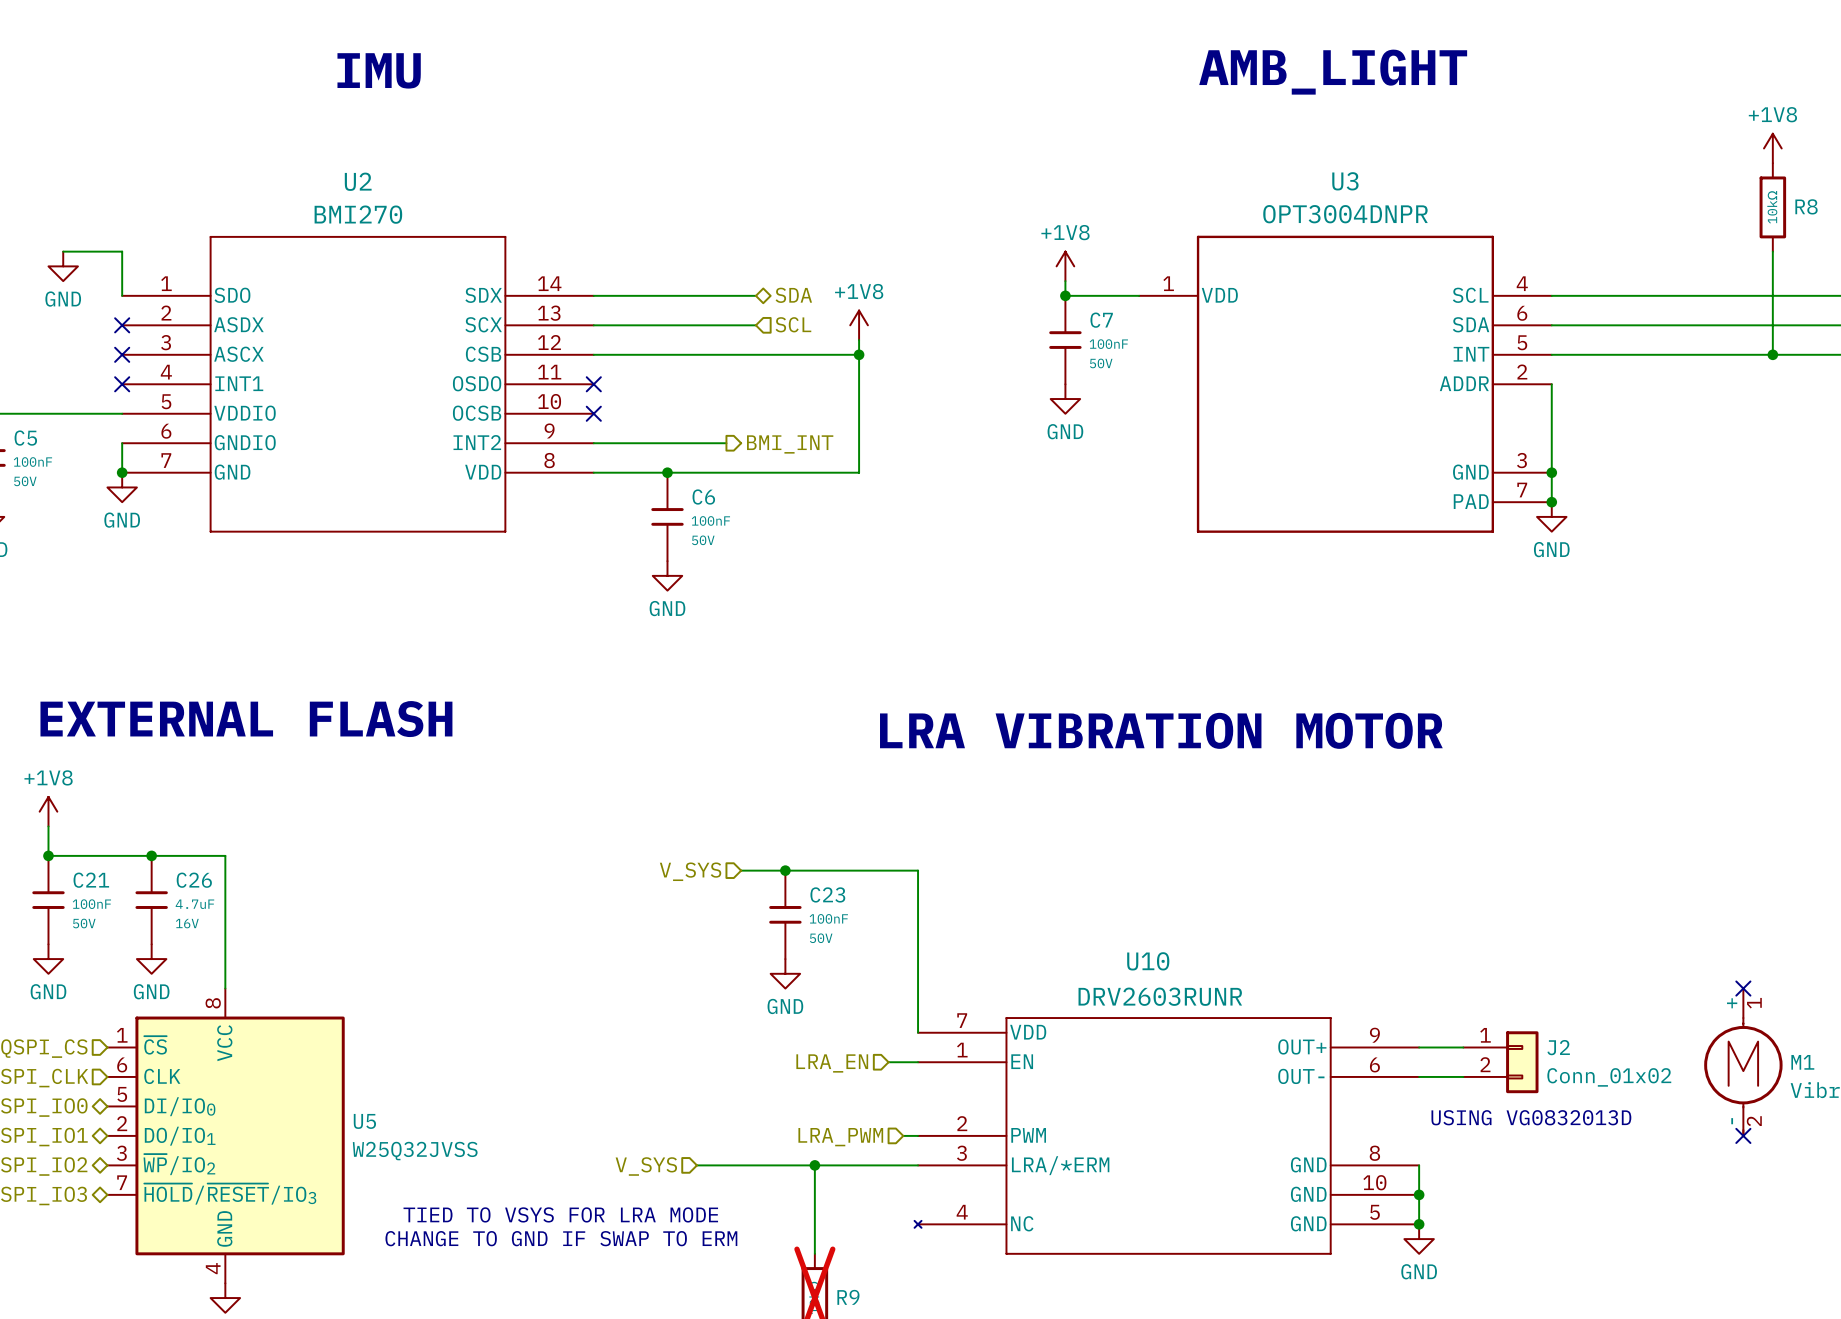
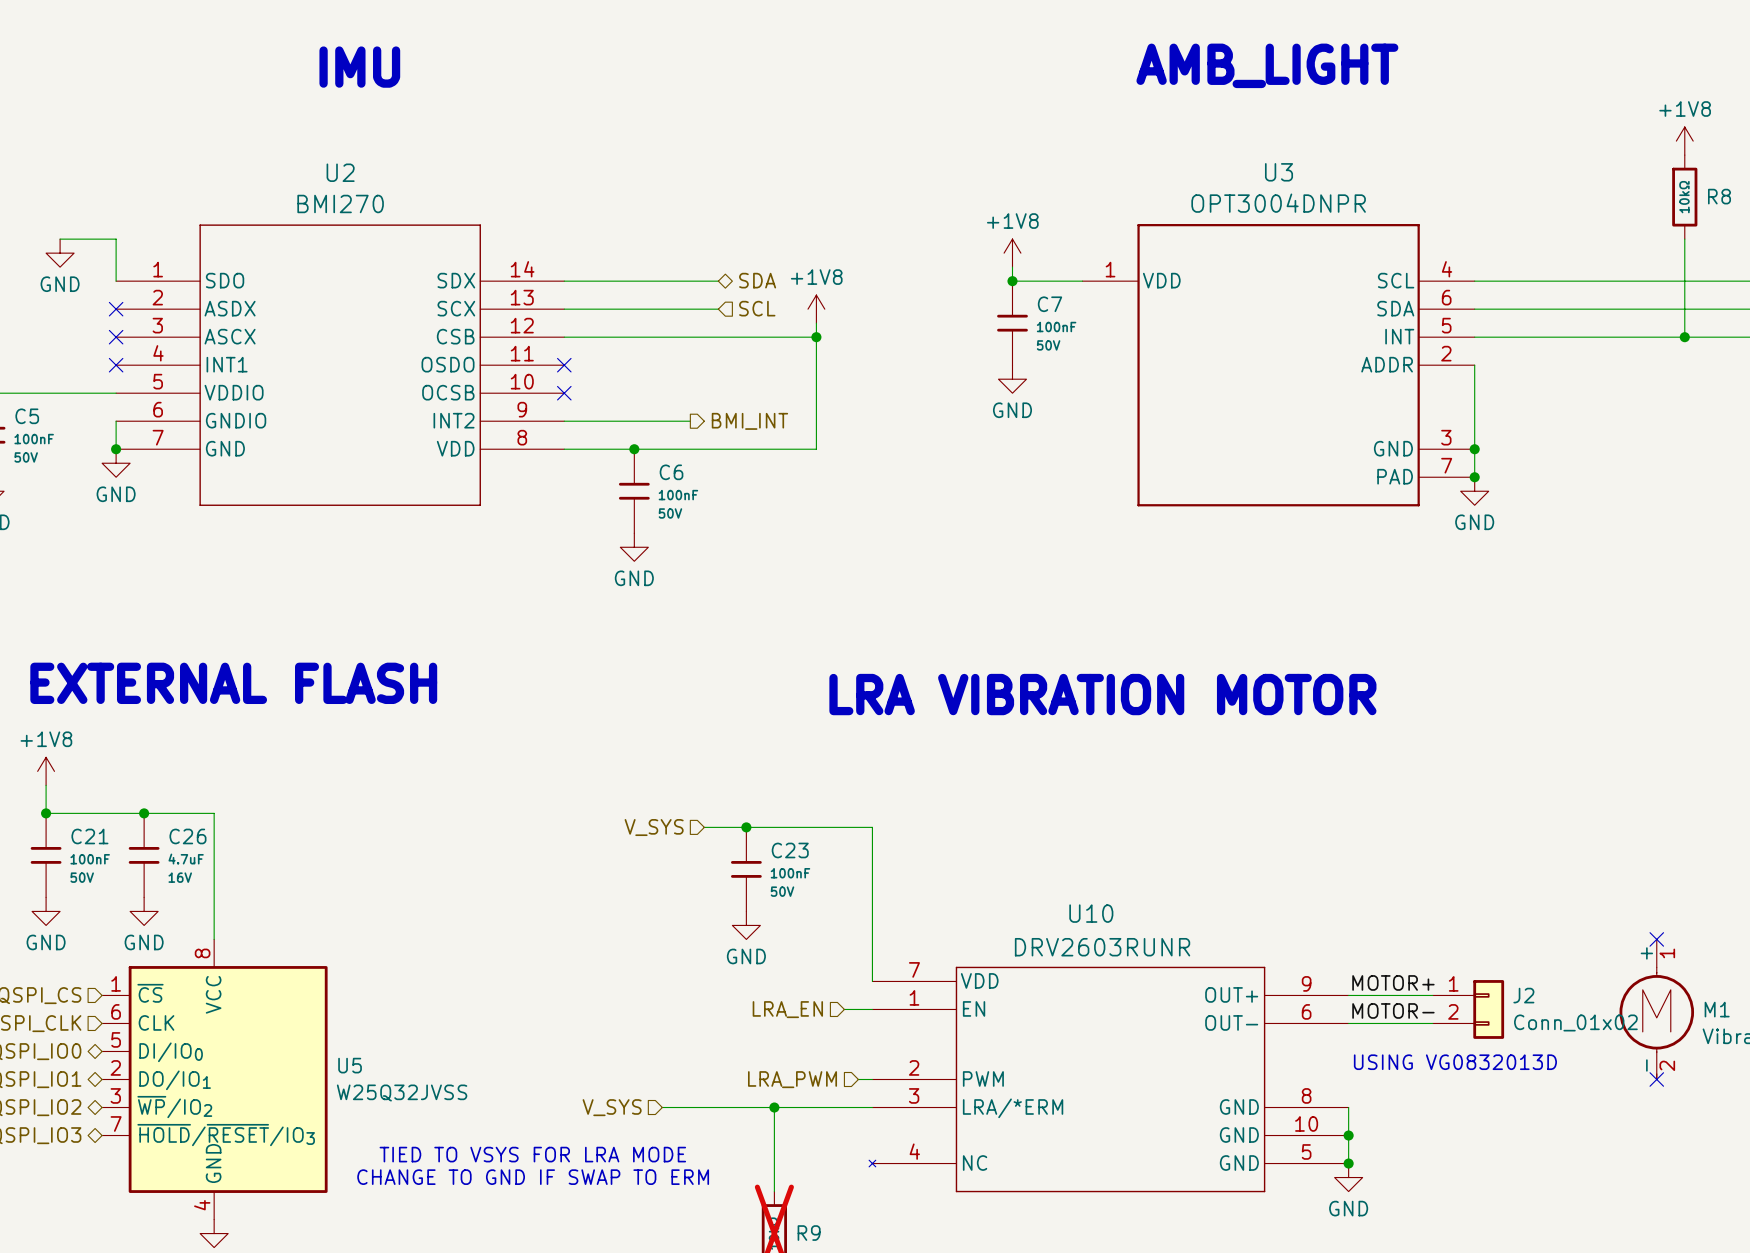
label: none -> MOTOR+ (1393, 982)
J2 position: (1500, 1062) -> (1468, 1009)
label: none -> MOTOR- (1393, 1010)

